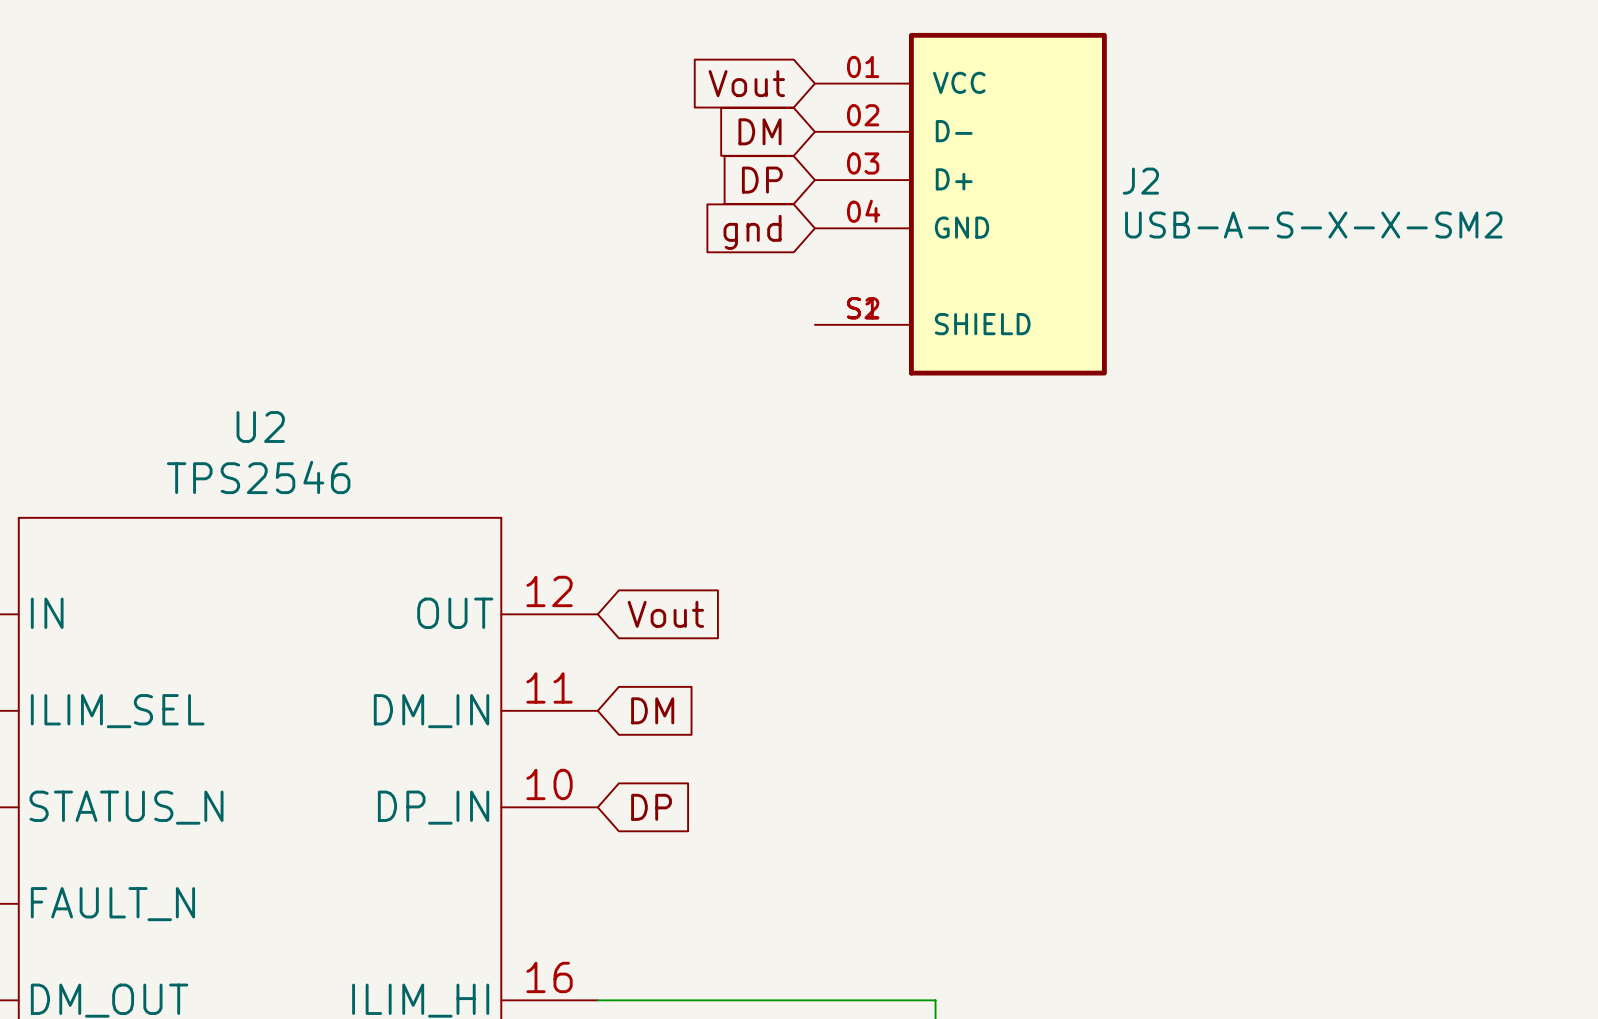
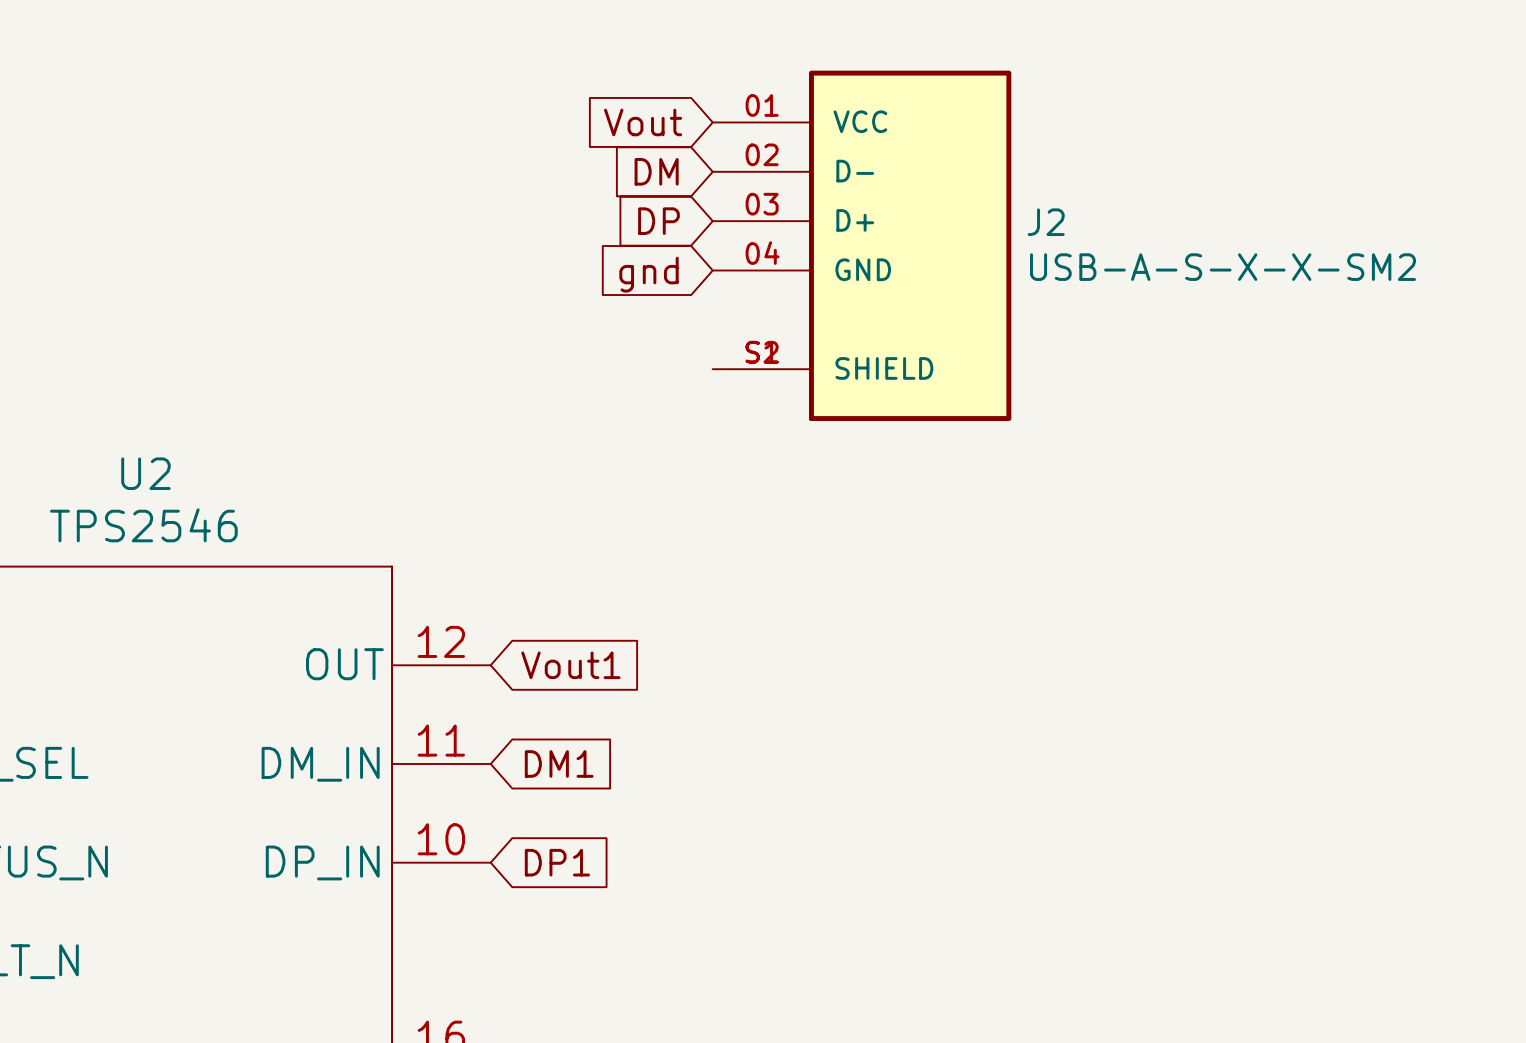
global label: Vout (665, 614) -> Vout1 (570, 665)
global label: DM (652, 710) -> DM1 (559, 763)
global label: DP (651, 807) -> DP1 (557, 862)

